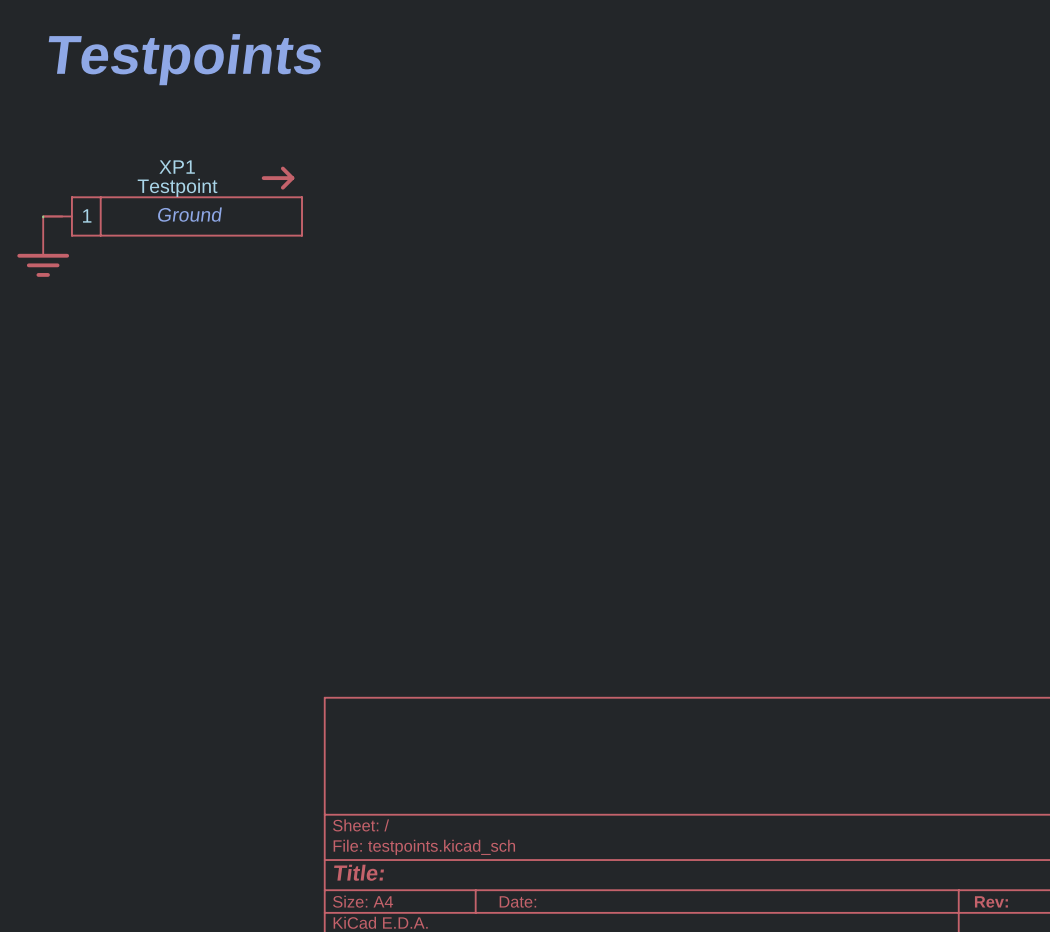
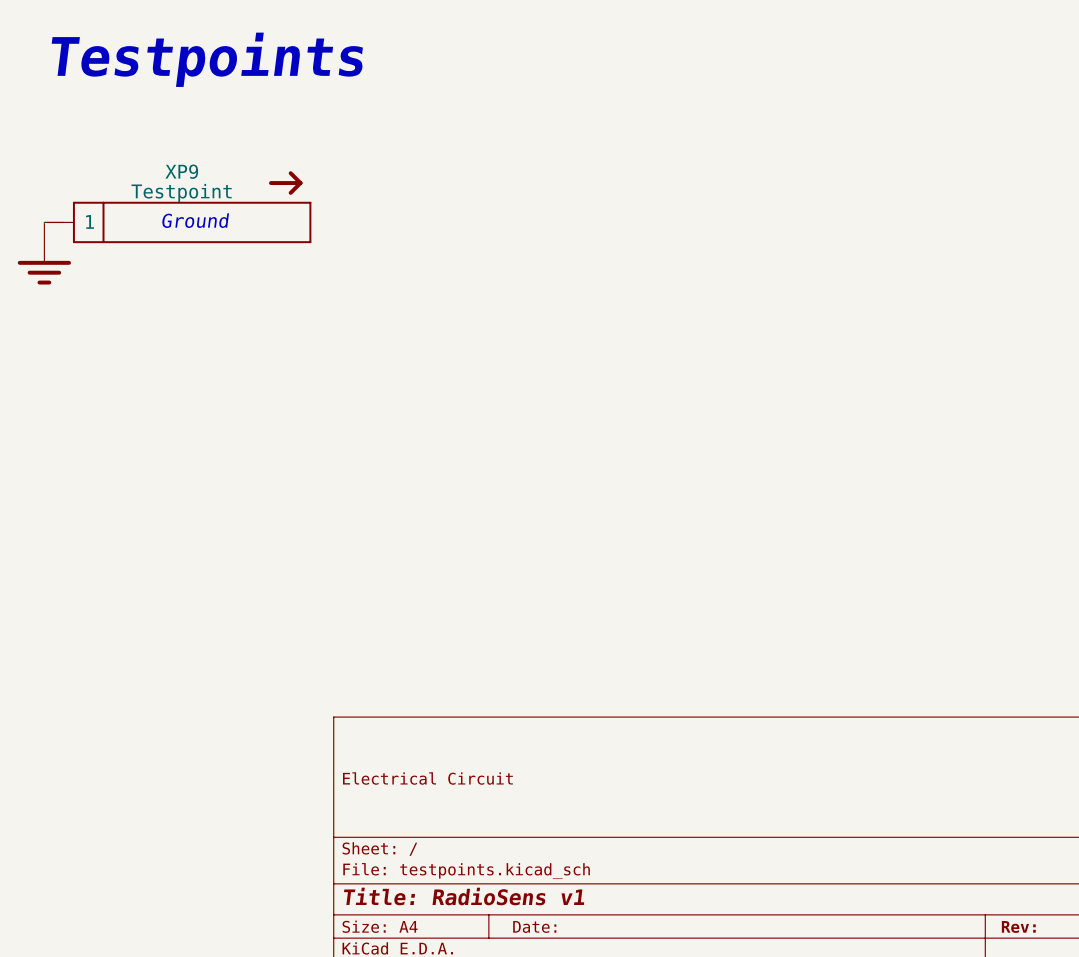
XP1 name: XP1 (177, 167) -> XP9 (181, 171)
title block: none -> Electrical Circuit (427, 778)
title block: Title: (359, 872) -> Title: RadioSens v1 (464, 896)

